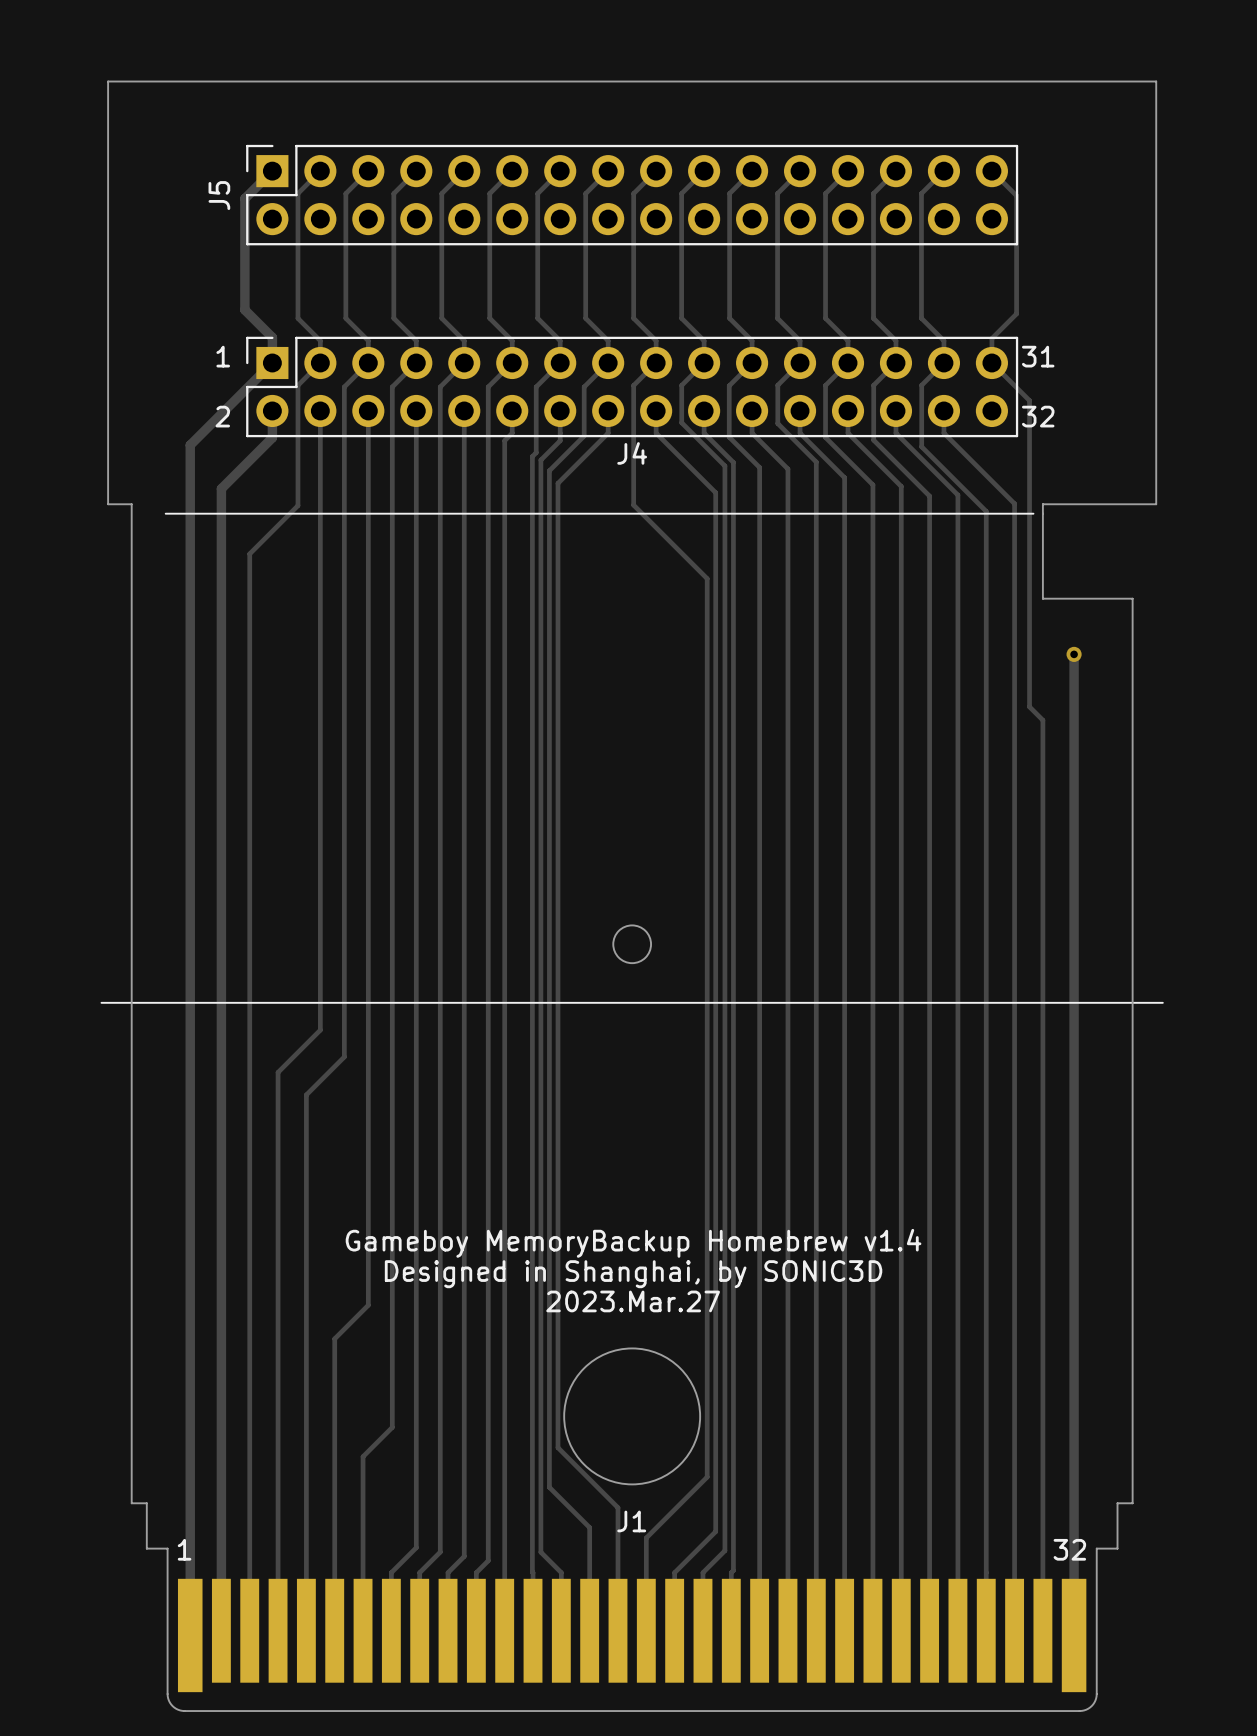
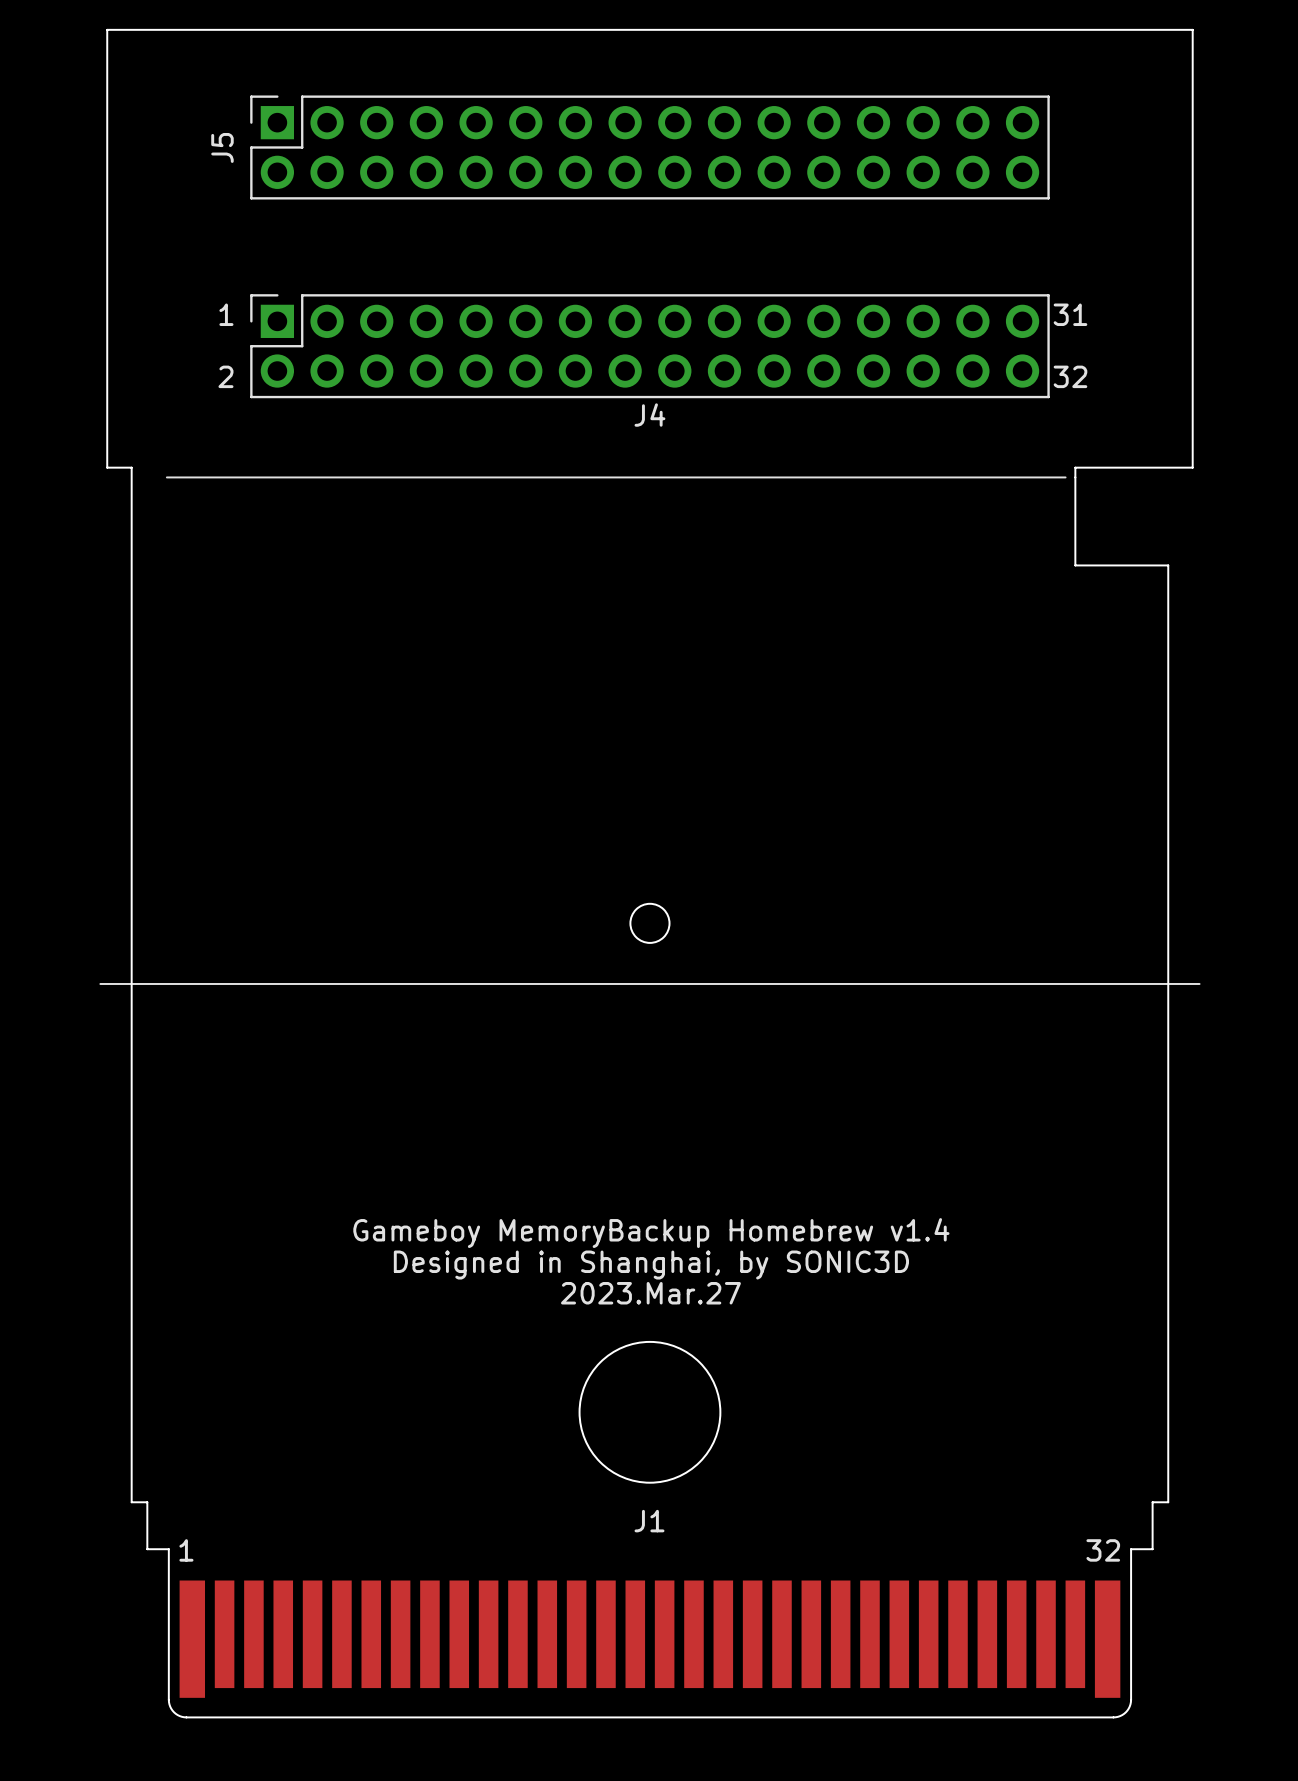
track: (272, 171) (244, 198) (244, 310) (272, 337) (272, 363) (190, 445) (190, 1635) -> none
track: (320, 171) (297, 193) (297, 318) (320, 340) (320, 363) (297, 385) (297, 505) (249, 553) (249, 1630) -> none
track: (368, 171) (345, 193) (345, 318) (368, 340) (368, 363) (344, 386) (344, 1056) (306, 1094) (306, 1630) -> none
track: (416, 171) (393, 193) (393, 318) (416, 340) (416, 363) (392, 386) (392, 1427) (363, 1456) (363, 1630) -> none
track: (464, 171) (441, 193) (441, 318) (464, 340) (464, 363) (440, 386) (440, 1552) (419, 1572) (419, 1630) -> none
track: (512, 171) (489, 193) (489, 318) (512, 340) (512, 363) (488, 386) (488, 1560) (476, 1572) (476, 1630) -> none
track: (560, 171) (537, 193) (537, 318) (560, 340) (560, 363) (536, 386) (536, 452) (532, 456) (533, 1630) -> none
track: (608, 171) (585, 193) (585, 318) (608, 340) (608, 363) (584, 386) (584, 435) (549, 470) (549, 1487) (589, 1527) (589, 1630) -> none
track: (656, 171) (633, 193) (633, 318) (656, 340) (656, 363) (633, 385) (633, 505) (707, 578) (707, 1477) (646, 1537) (646, 1630) -> none
track: (704, 171) (681, 193) (681, 318) (704, 340) (704, 363) (681, 385) (681, 422) (724, 466) (724, 1550) (702, 1572) (702, 1630) -> none
track: (752, 171) (729, 193) (729, 318) (752, 340) (752, 363) (729, 385) (729, 437) (759, 467) (759, 1630) -> none
track: (800, 171) (777, 193) (777, 318) (800, 340) (800, 363) (777, 385) (777, 423) (816, 462) (816, 1630) -> none
track: (848, 171) (825, 193) (825, 318) (848, 340) (848, 363) (825, 385) (825, 437) (872, 484) (872, 1630) -> none
track: (895, 171) (873, 193) (873, 318) (895, 340) (895, 363) (873, 385) (873, 440) (929, 496) (929, 1630) -> none
track: (943, 171) (921, 193) (921, 318) (943, 340) (943, 363) (921, 385) (921, 446) (986, 511) (986, 1630) -> none
track: (991, 171) (1016, 195) (1016, 313) (991, 338) (991, 363) (1029, 400) (1029, 706) (1042, 720) (1042, 1630) -> none
track: (272, 410) (272, 437) (221, 488) (221, 1630) -> none
track: (320, 410) (320, 1030) (278, 1072) (278, 1630) -> none
track: (368, 410) (368, 1305) (334, 1338) (334, 1630) -> none
track: (416, 410) (416, 1547) (391, 1572) (391, 1630) -> none
track: (464, 410) (464, 1556) (448, 1572) (448, 1630) -> none
track: (512, 410) (512, 433) (504, 440) (504, 1630) -> none
track: (560, 410) (560, 440) (540, 460) (540, 1552) (561, 1572) (561, 1630) -> none
track: (608, 410) (608, 433) (558, 483) (558, 1447) (617, 1507) (617, 1630) -> none
track: (656, 410) (656, 433) (715, 492) (715, 1531) (674, 1572) (674, 1630) -> none
track: (704, 410) (704, 433) (733, 462) (733, 1570) (731, 1572) (731, 1630) -> none
track: (752, 410) (752, 433) (787, 469) (787, 1630) -> none
track: (800, 410) (800, 433) (844, 477) (844, 1630) -> none
track: (848, 410) (848, 433) (901, 486) (901, 1630) -> none
track: (895, 410) (895, 433) (957, 495) (957, 1630) -> none
track: (943, 410) (943, 433) (1014, 503) (1014, 1630) -> none
track: (1074, 654) (1074, 1635) -> none
via: (1074, 654) -> none

